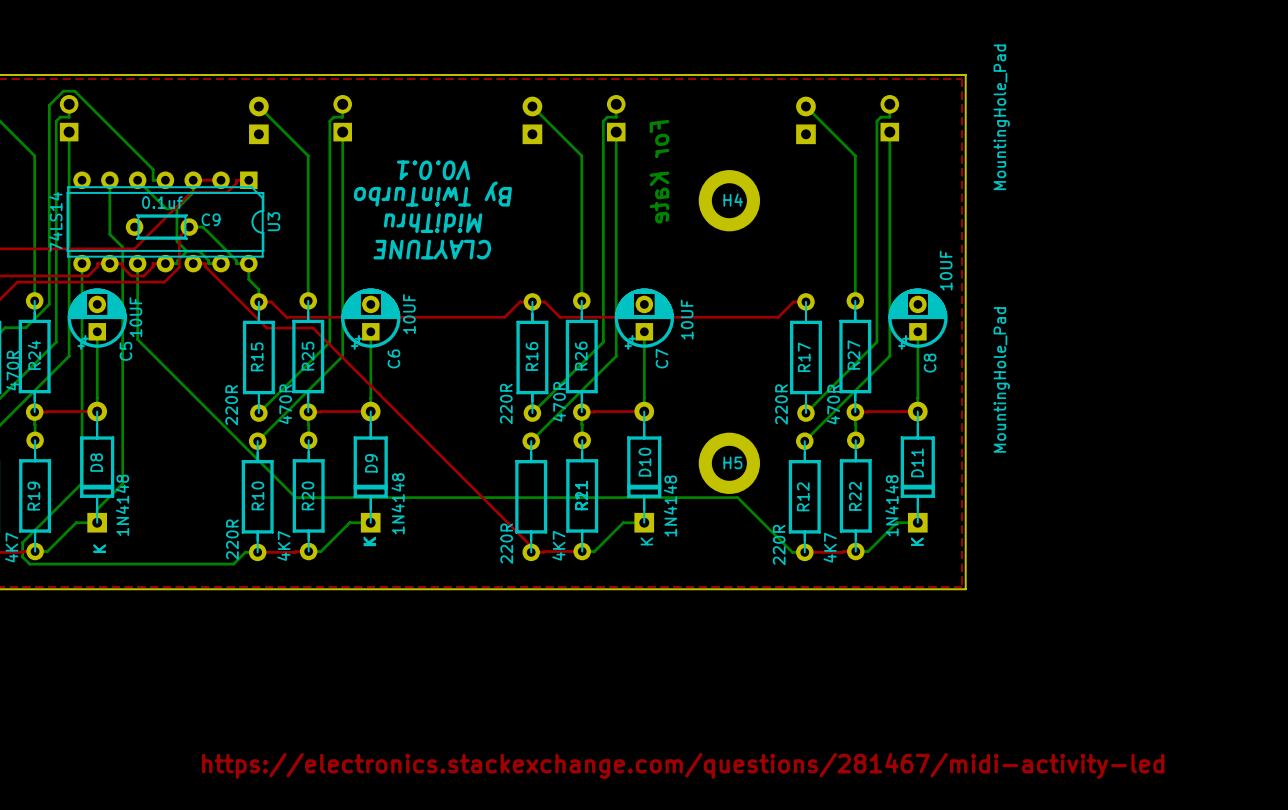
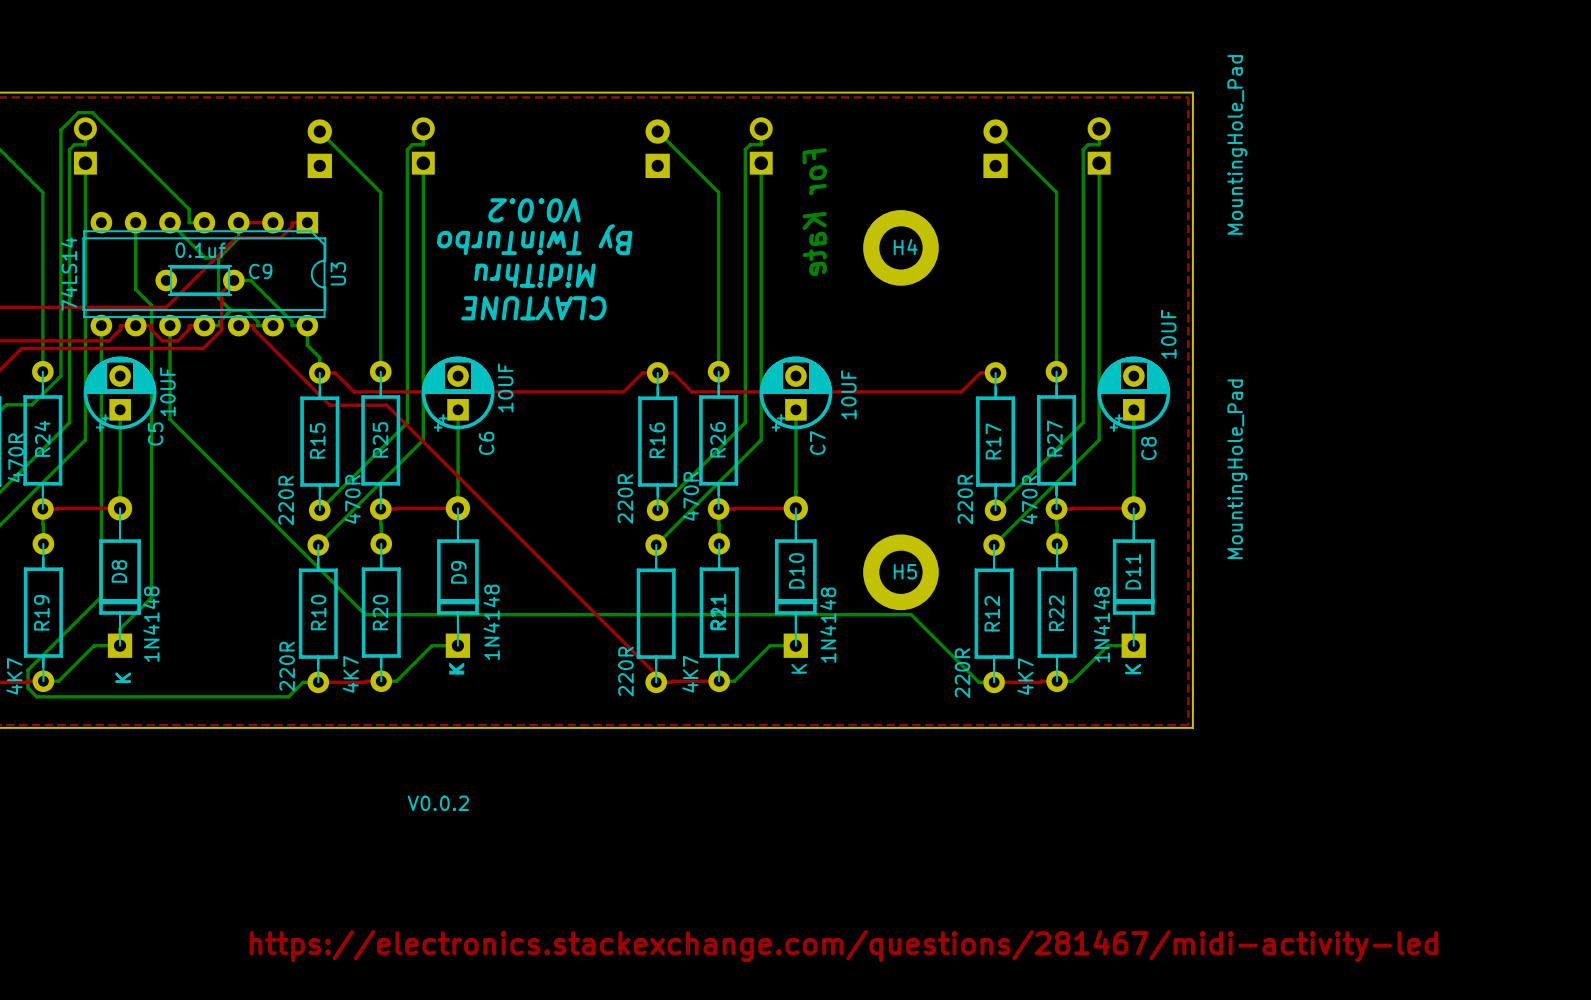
text: V0.0.1 (433, 170) -> V0.0.2 (534, 210)
text: none -> V0.0.2 (438, 803)

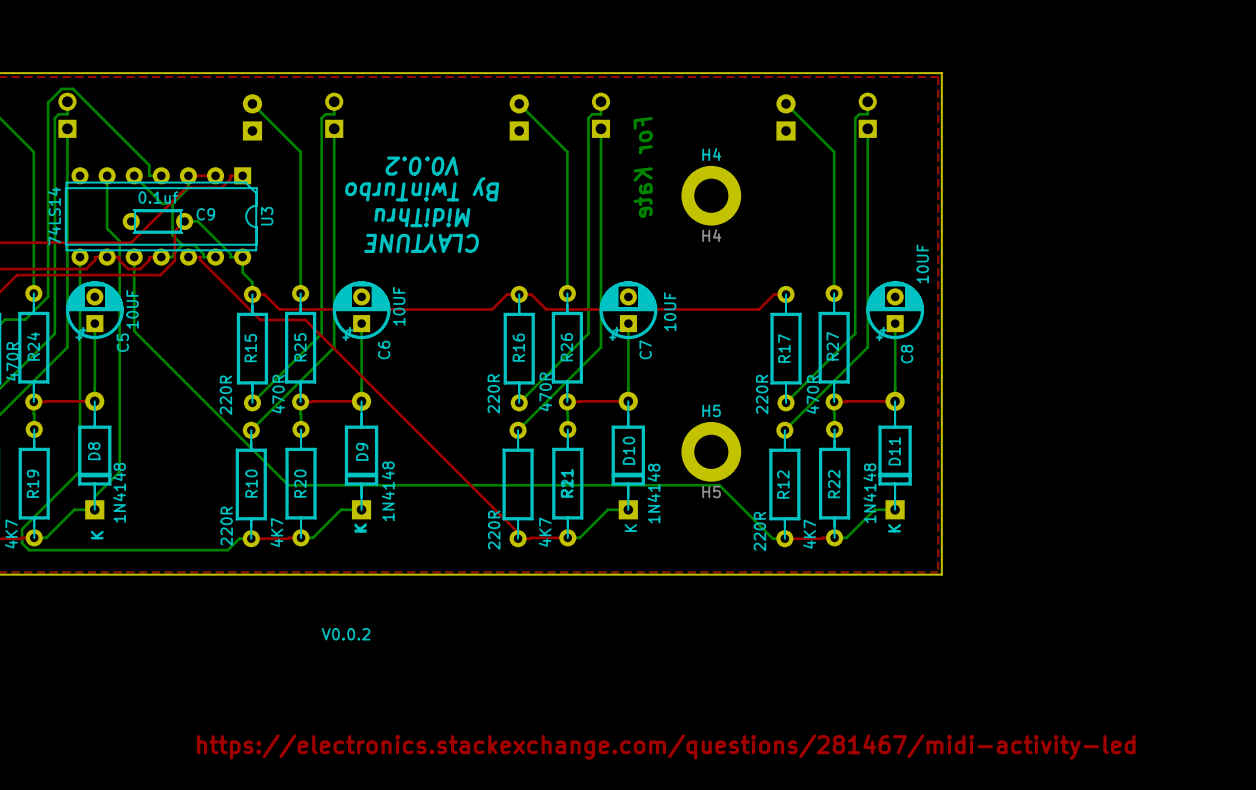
H4 value: MountingHole_Pad (1237, 144) -> H4 (711, 235)
H4 name position: H4 (905, 247) -> H4 (711, 154)
H5 value: MountingHole_Pad (1237, 469) -> H5 (711, 492)
H5 name position: H5 (905, 571) -> H5 (711, 410)

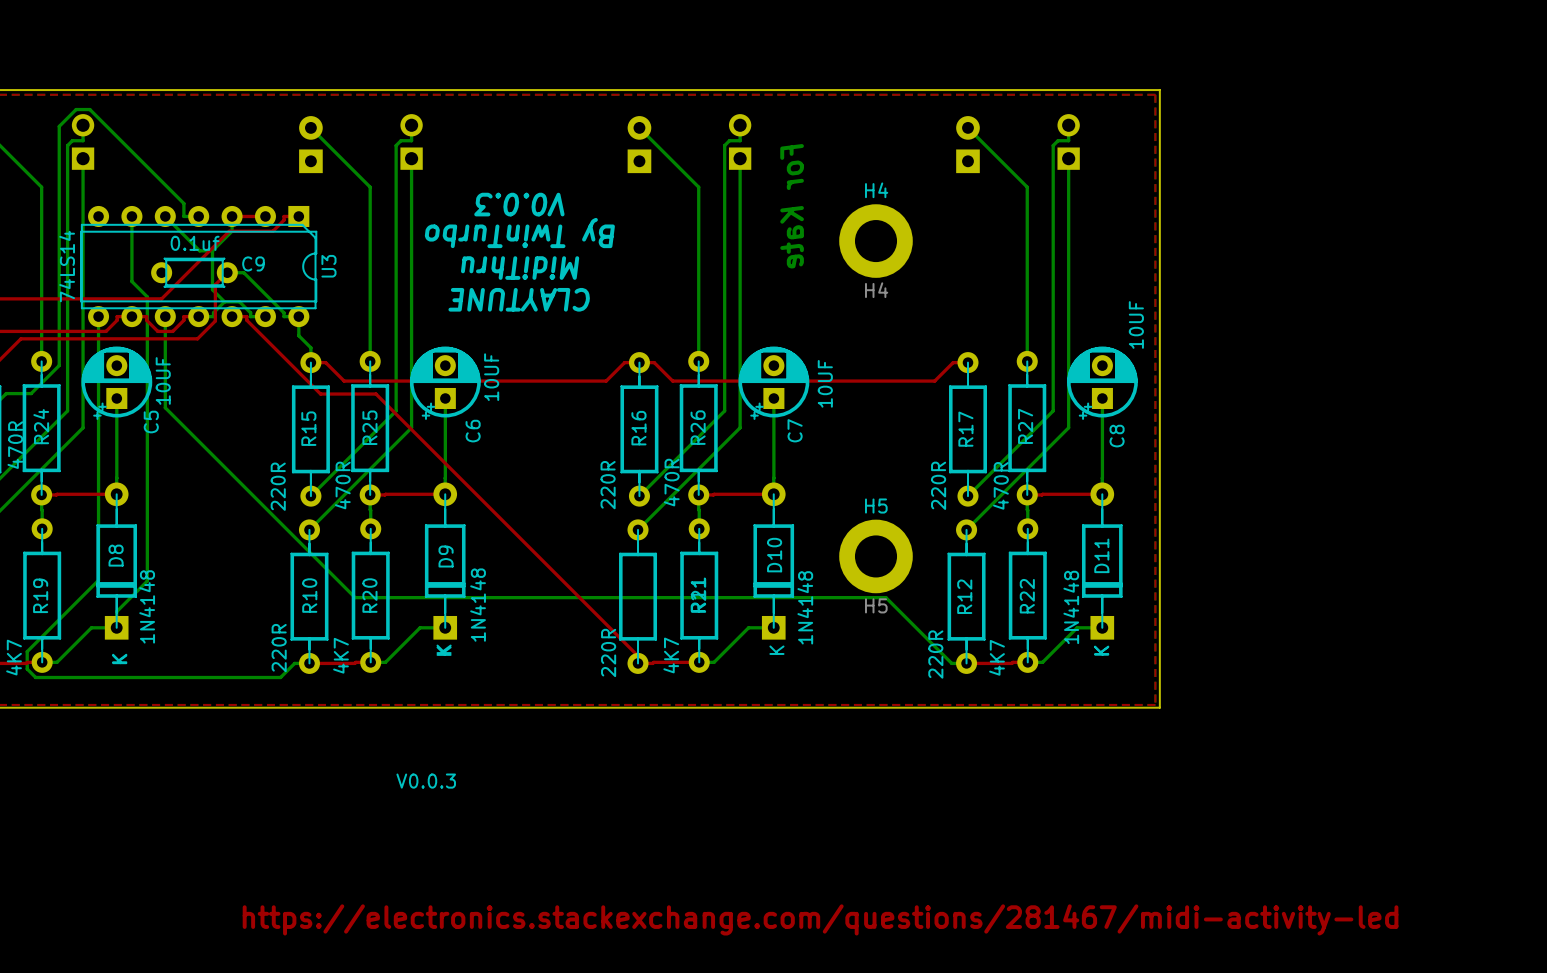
text: V0.0.2 (421, 166) -> V0.0.3 (519, 204)
text: V0.0.2 (346, 634) -> V0.0.3 (426, 781)

